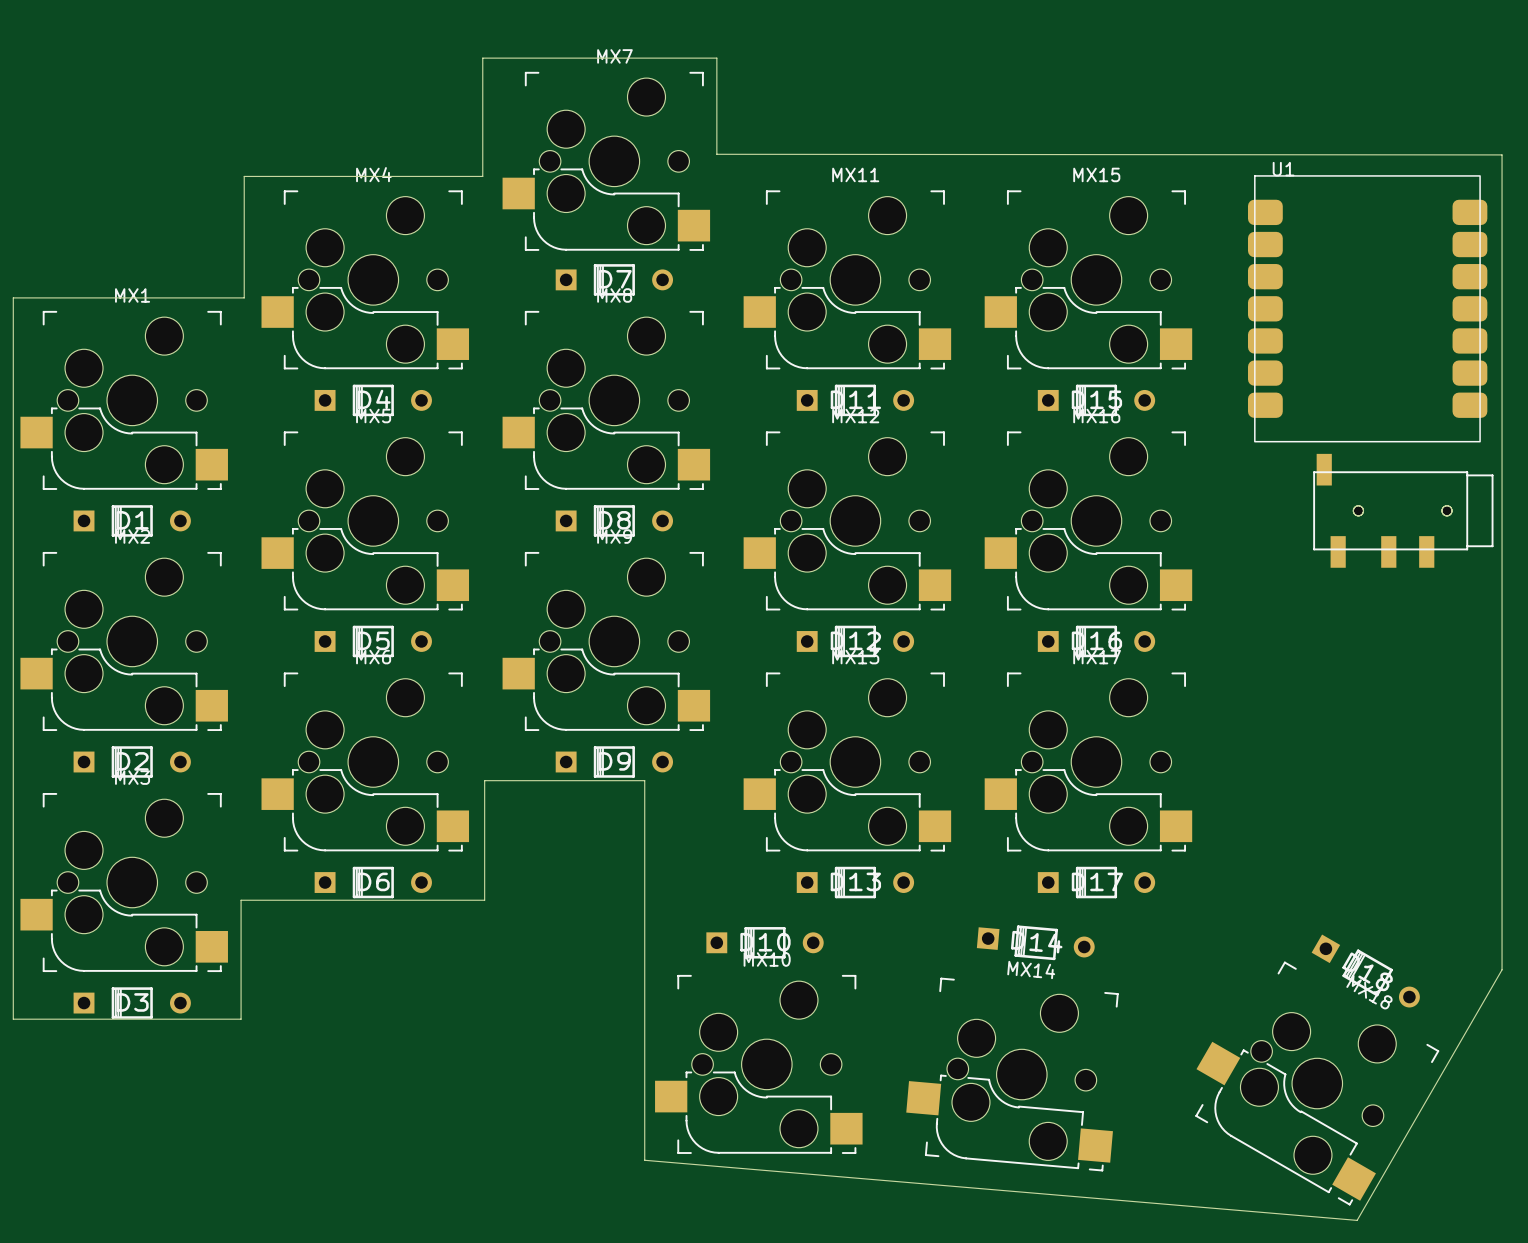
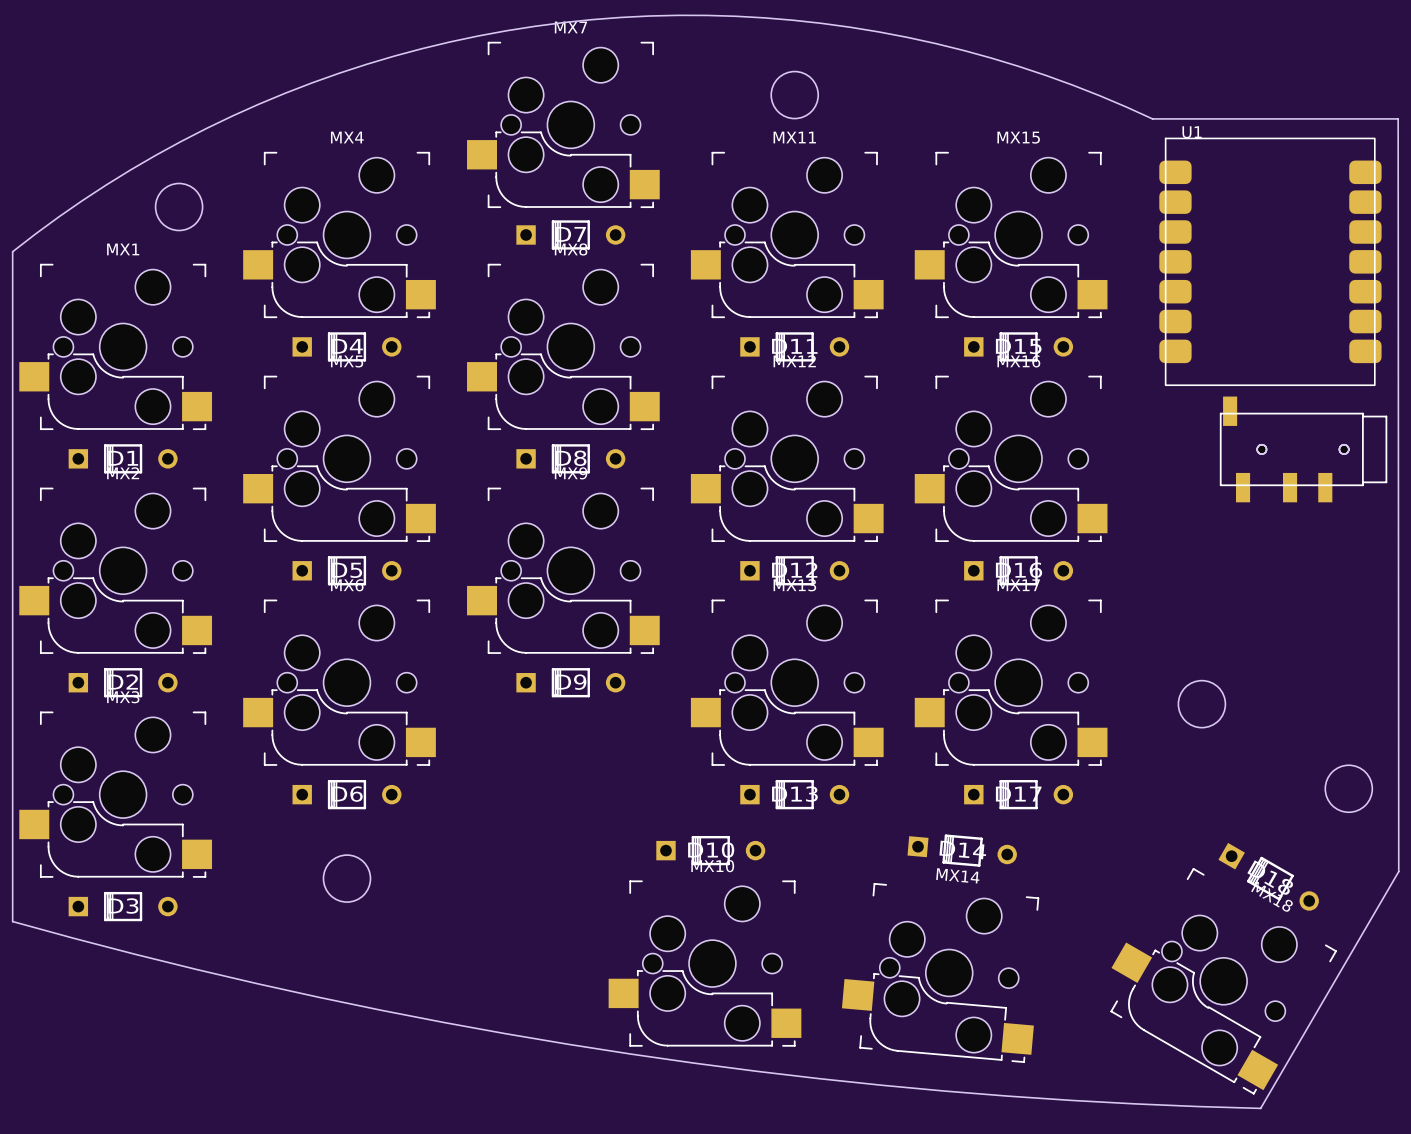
round board edge: none -> [770, 71, 819, 119]
round board edge: none -> [155, 183, 203, 231]
board edge: (13, 297) (244, 297) (244, 176) (482, 176) (482, 58) (716, 58) (716, 154) (1502, 154) (1502, 969) (1357, 1220) (644, 1160) (644, 780) (484, 780) (484, 900) (241, 900) (241, 1019) (13, 1019) -> (12, 251) (82, 200) (155, 155) (232, 115) (285, 93) (339, 73) (422, 48) (506, 30) (592, 19) (678, 15) (736, 16) (793, 20) (879, 31) (963, 50) (1018, 66) (1073, 85) (1152, 118) (1398, 118) (1398, 871) (1260, 1108) (1134, 1103) (944, 1091) (756, 1071) (630, 1054) (505, 1033) (319, 997) (196, 969) (12, 921)
round board edge: none -> [1178, 680, 1226, 728]
round board edge: none -> [1325, 764, 1373, 813]
round board edge: none -> [323, 854, 371, 903]

